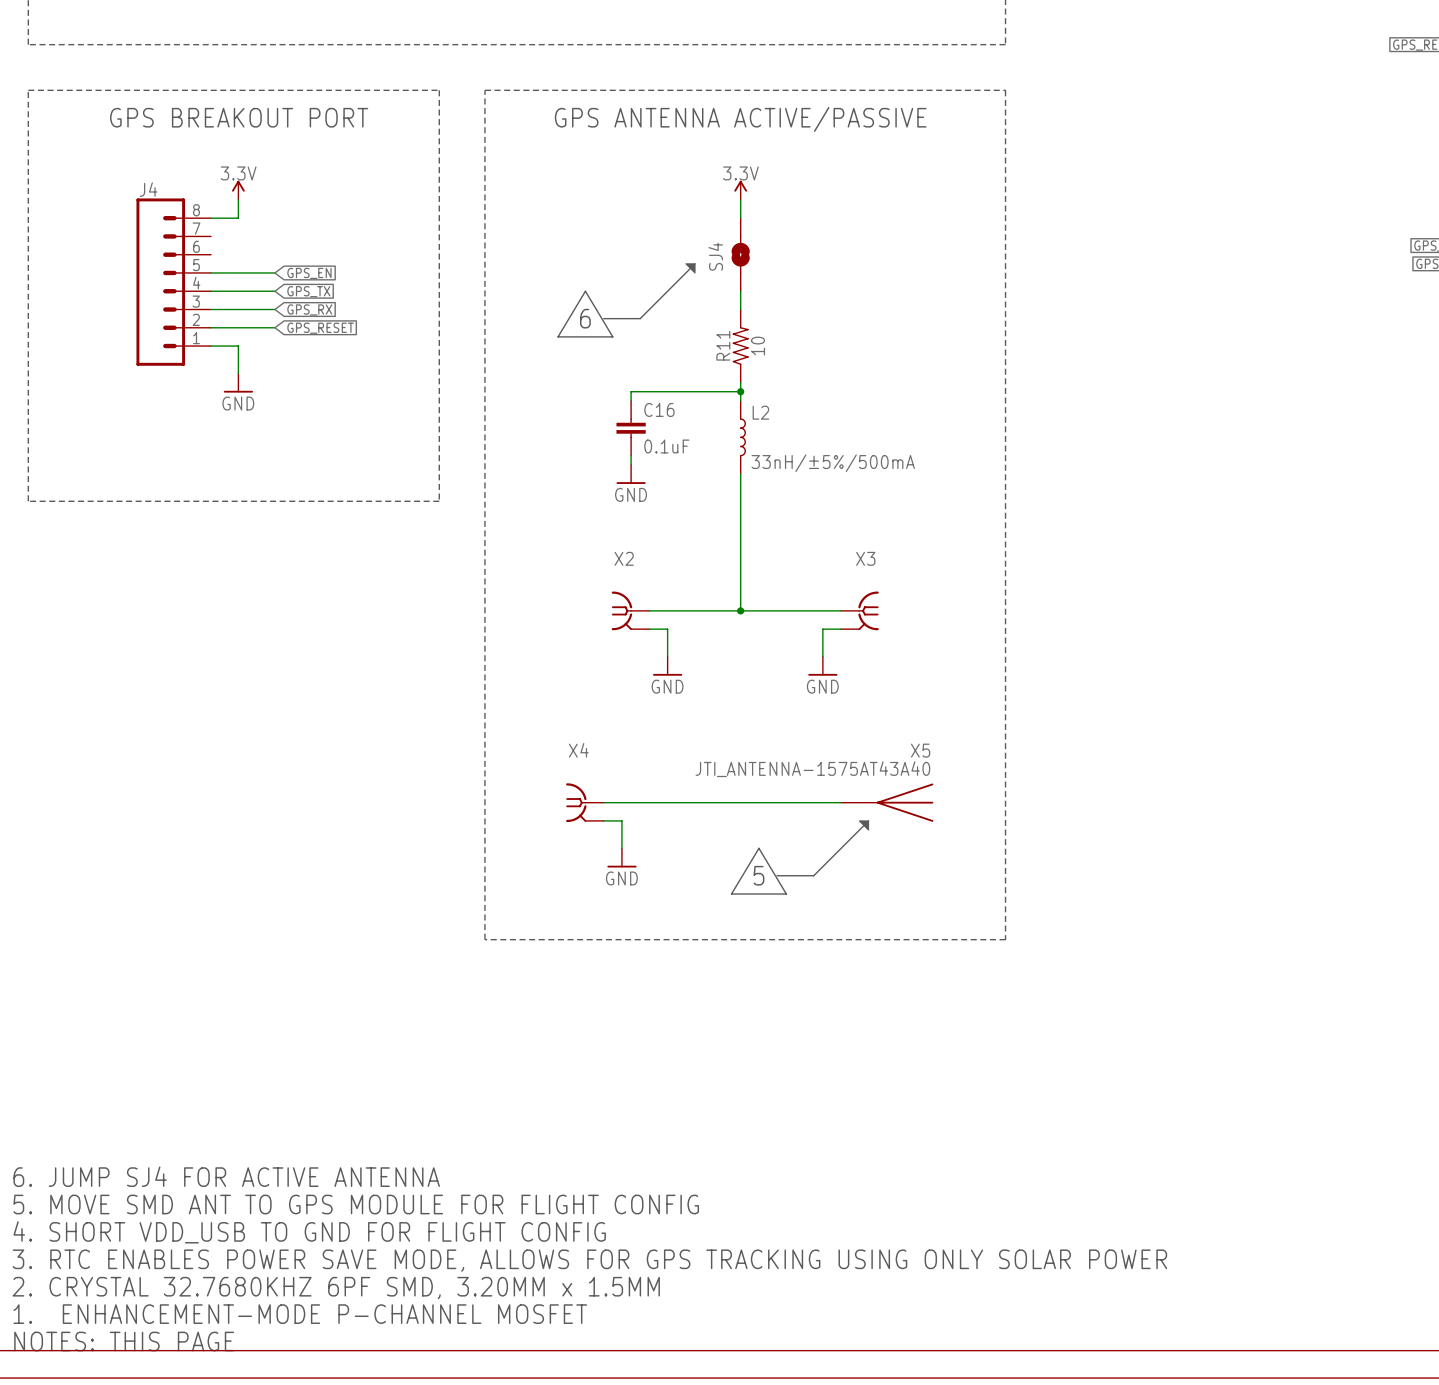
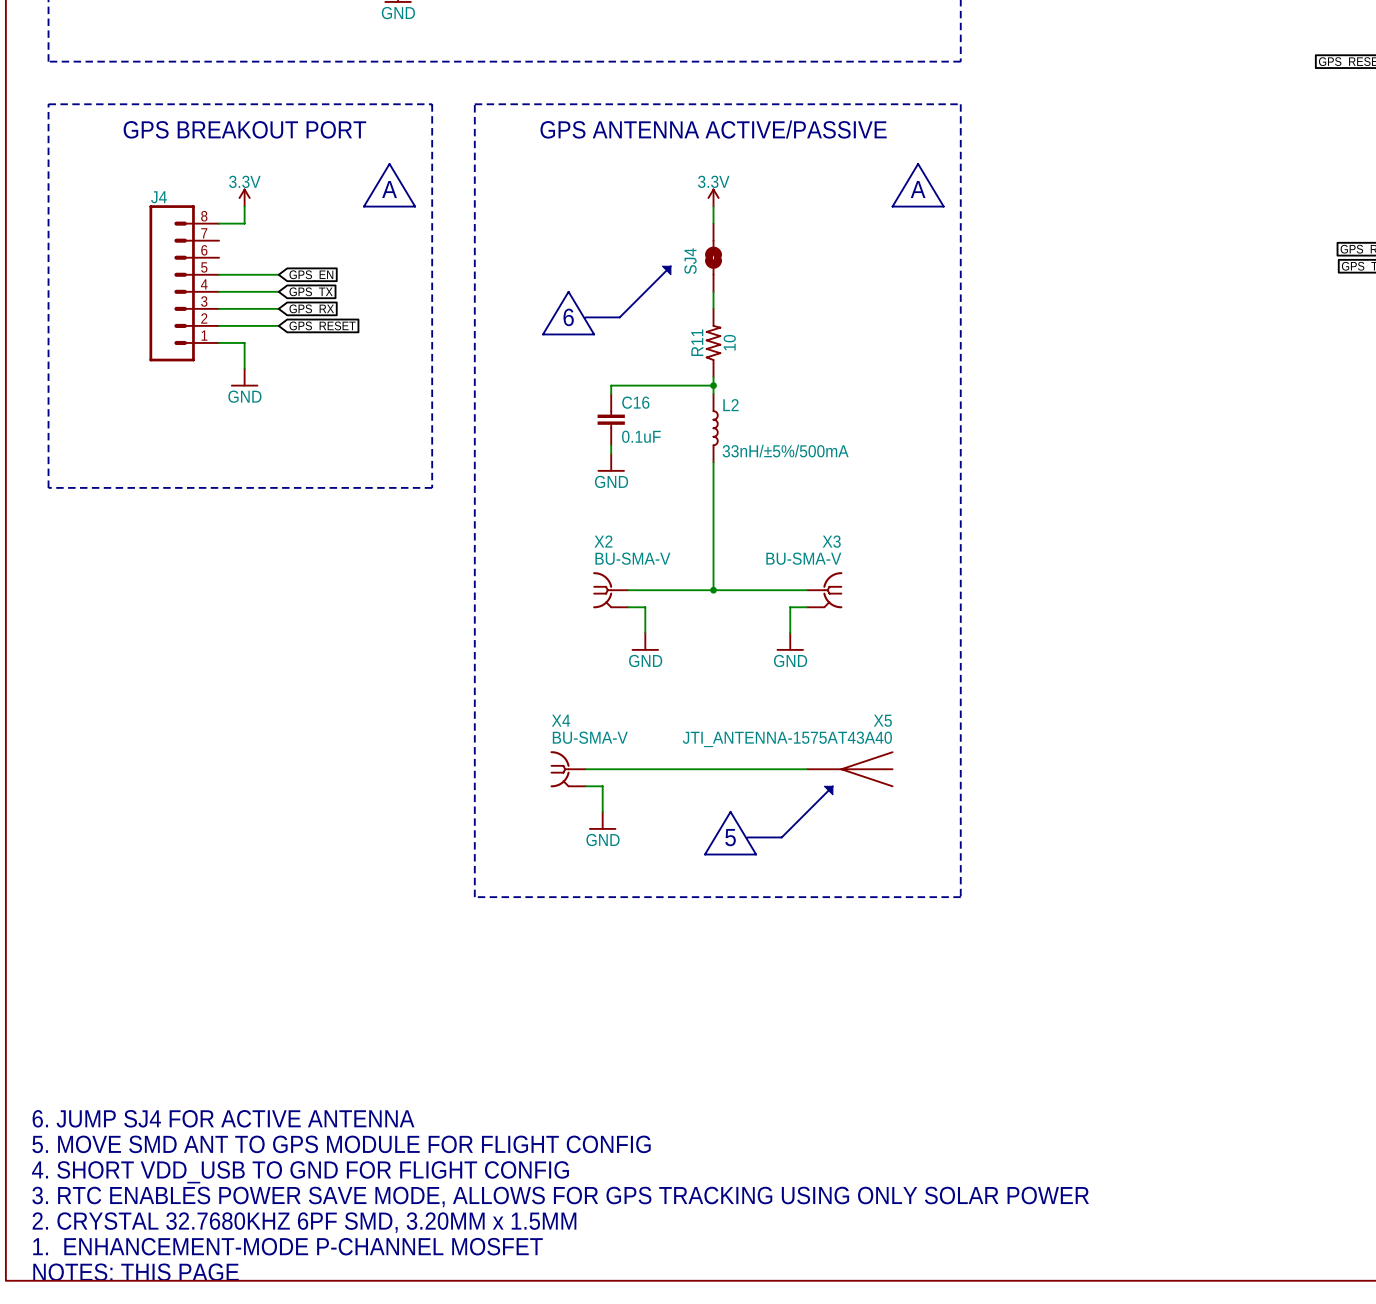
line: none -> (389, 163) (363, 206) (415, 206) (389, 163)
line: none -> (918, 163) (892, 206) (943, 206) (918, 163)
text: none -> A (389, 189)
text: none -> A (918, 189)
X2 value: none -> BU-SMA-V (632, 558)
X3 value: none -> BU-SMA-V (803, 558)
X4 value: none -> BU-SMA-V (590, 737)

